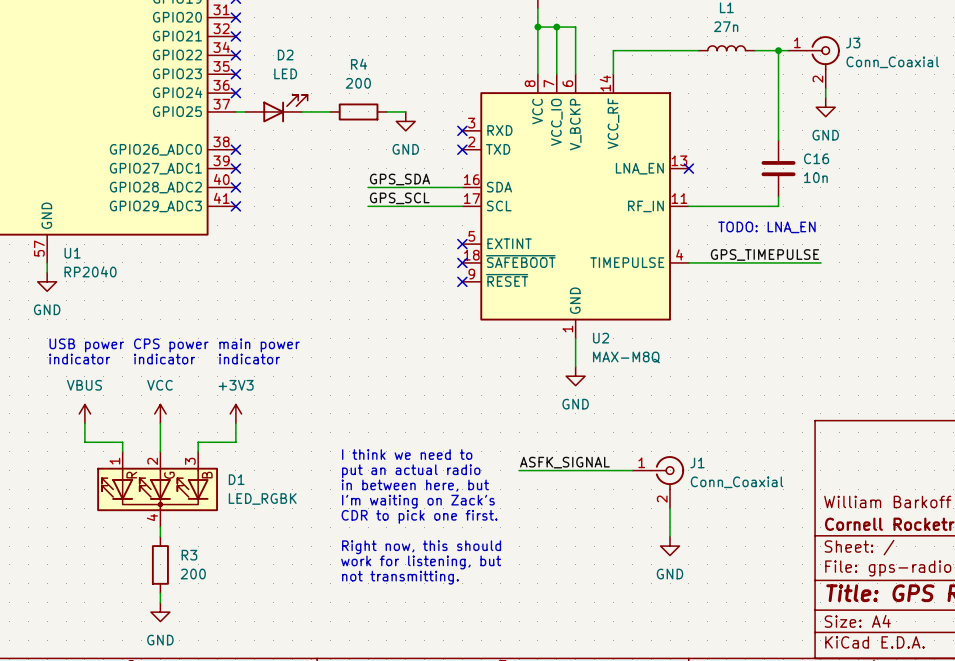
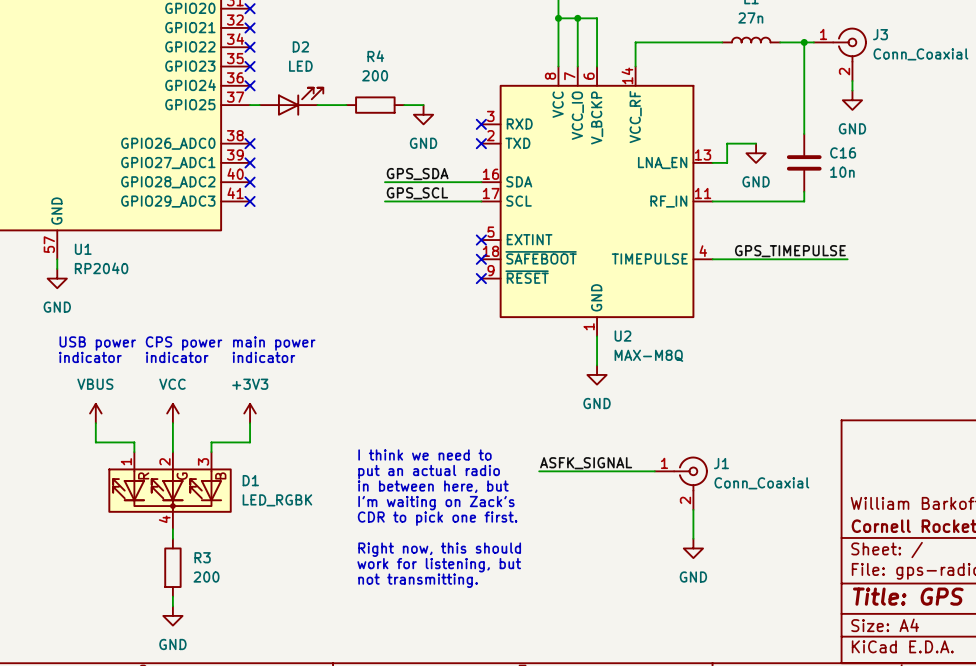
wire: none -> (756, 143) (727, 143) (727, 162) (712, 162)
power symbol: none -> GND (756, 153)
no-connect mark: (688, 168) -> none
text: TODO: LNA_EN (766, 227) -> none

